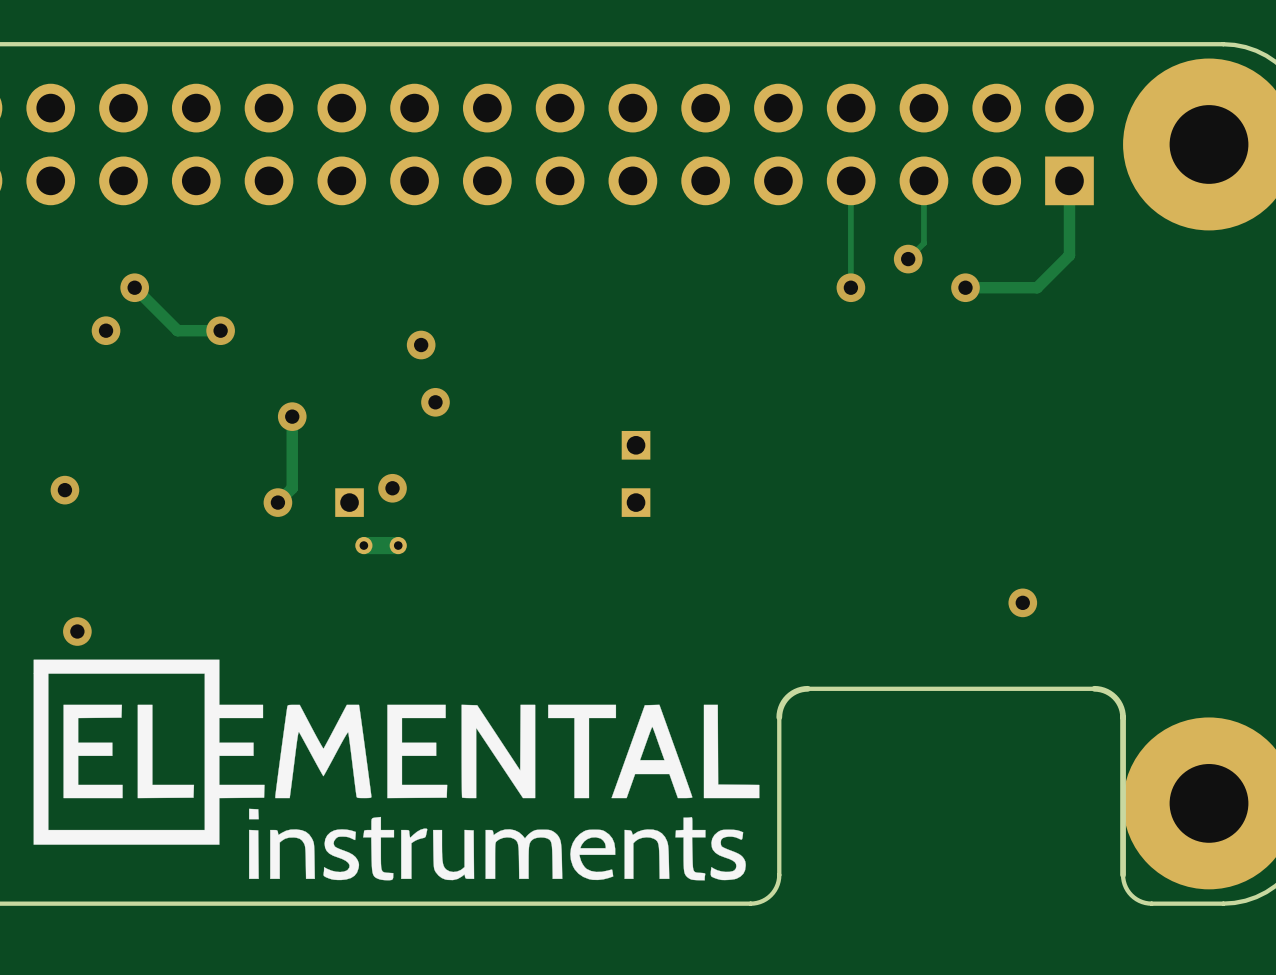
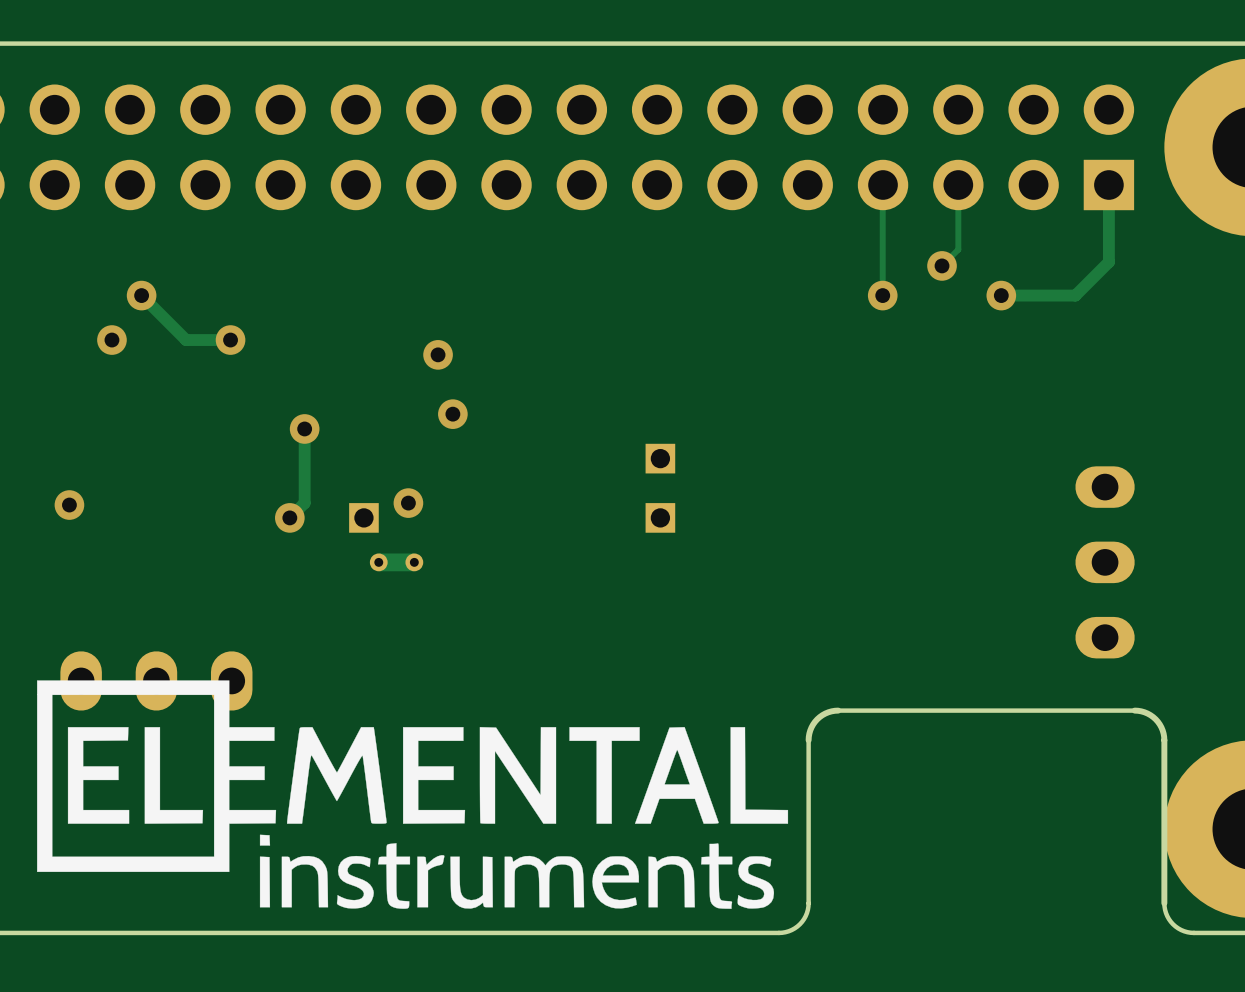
part: none -> (1105, 562)
via: (1022, 602) -> none
via: (77, 631) -> none
part: none -> (156, 680)

